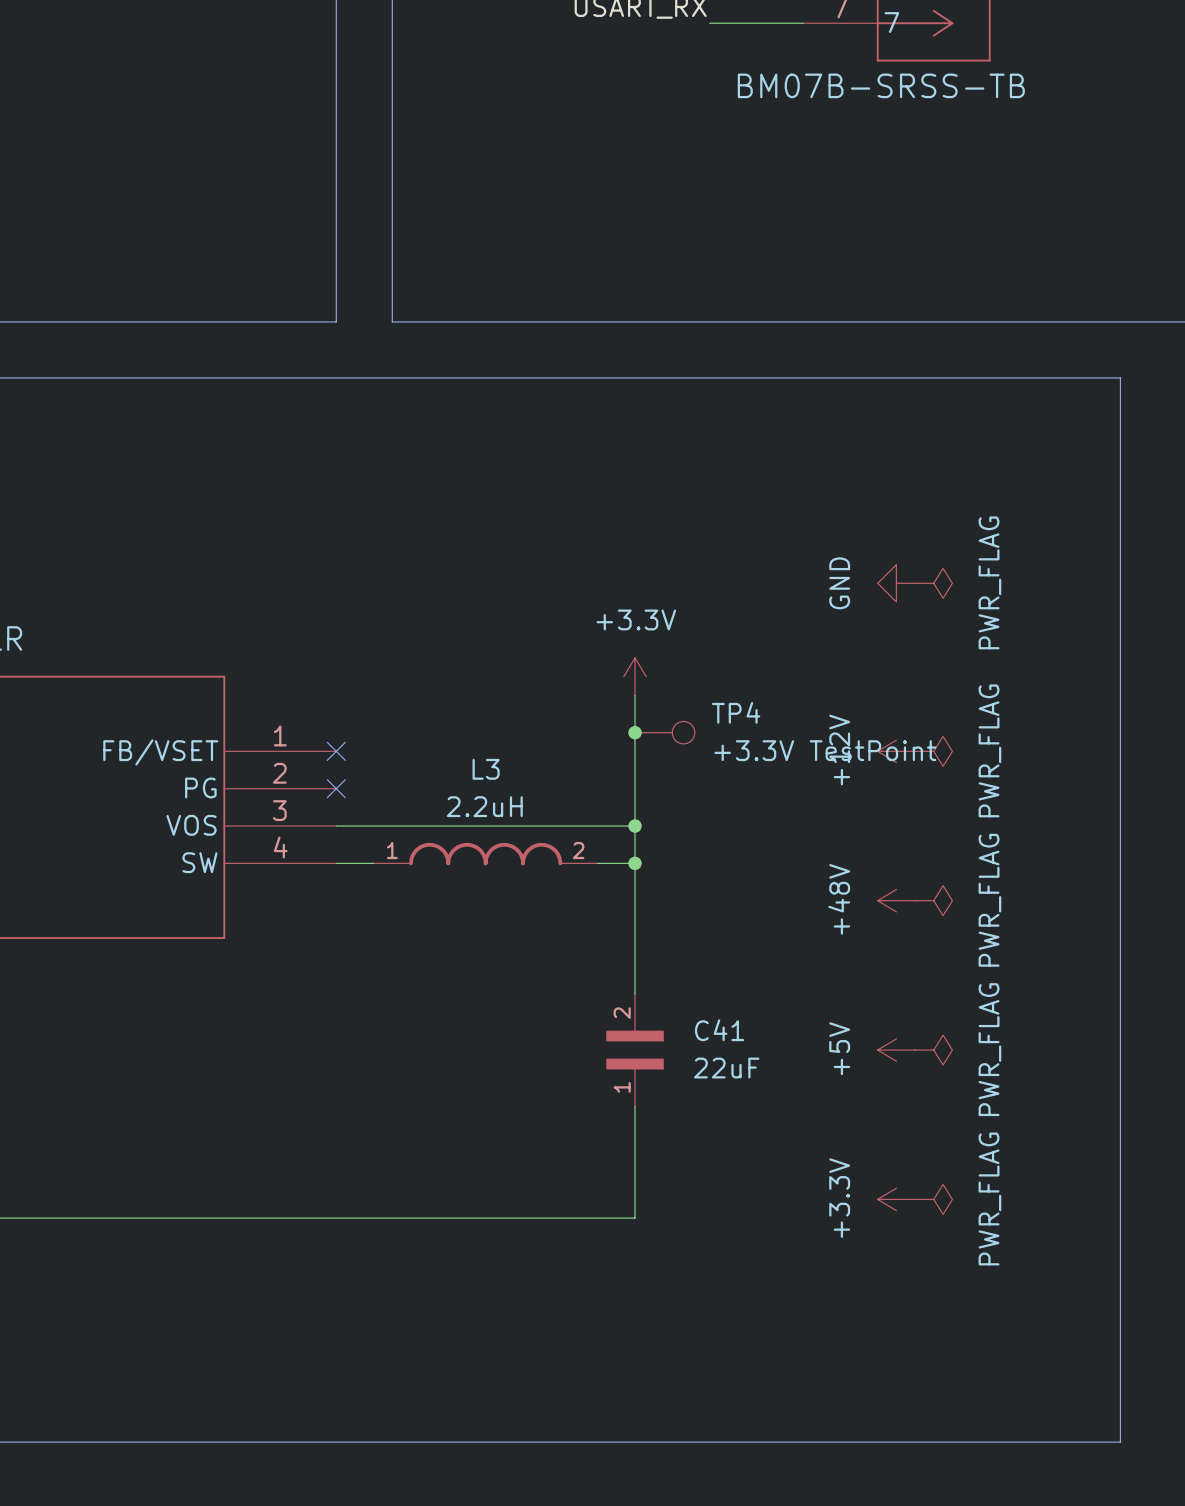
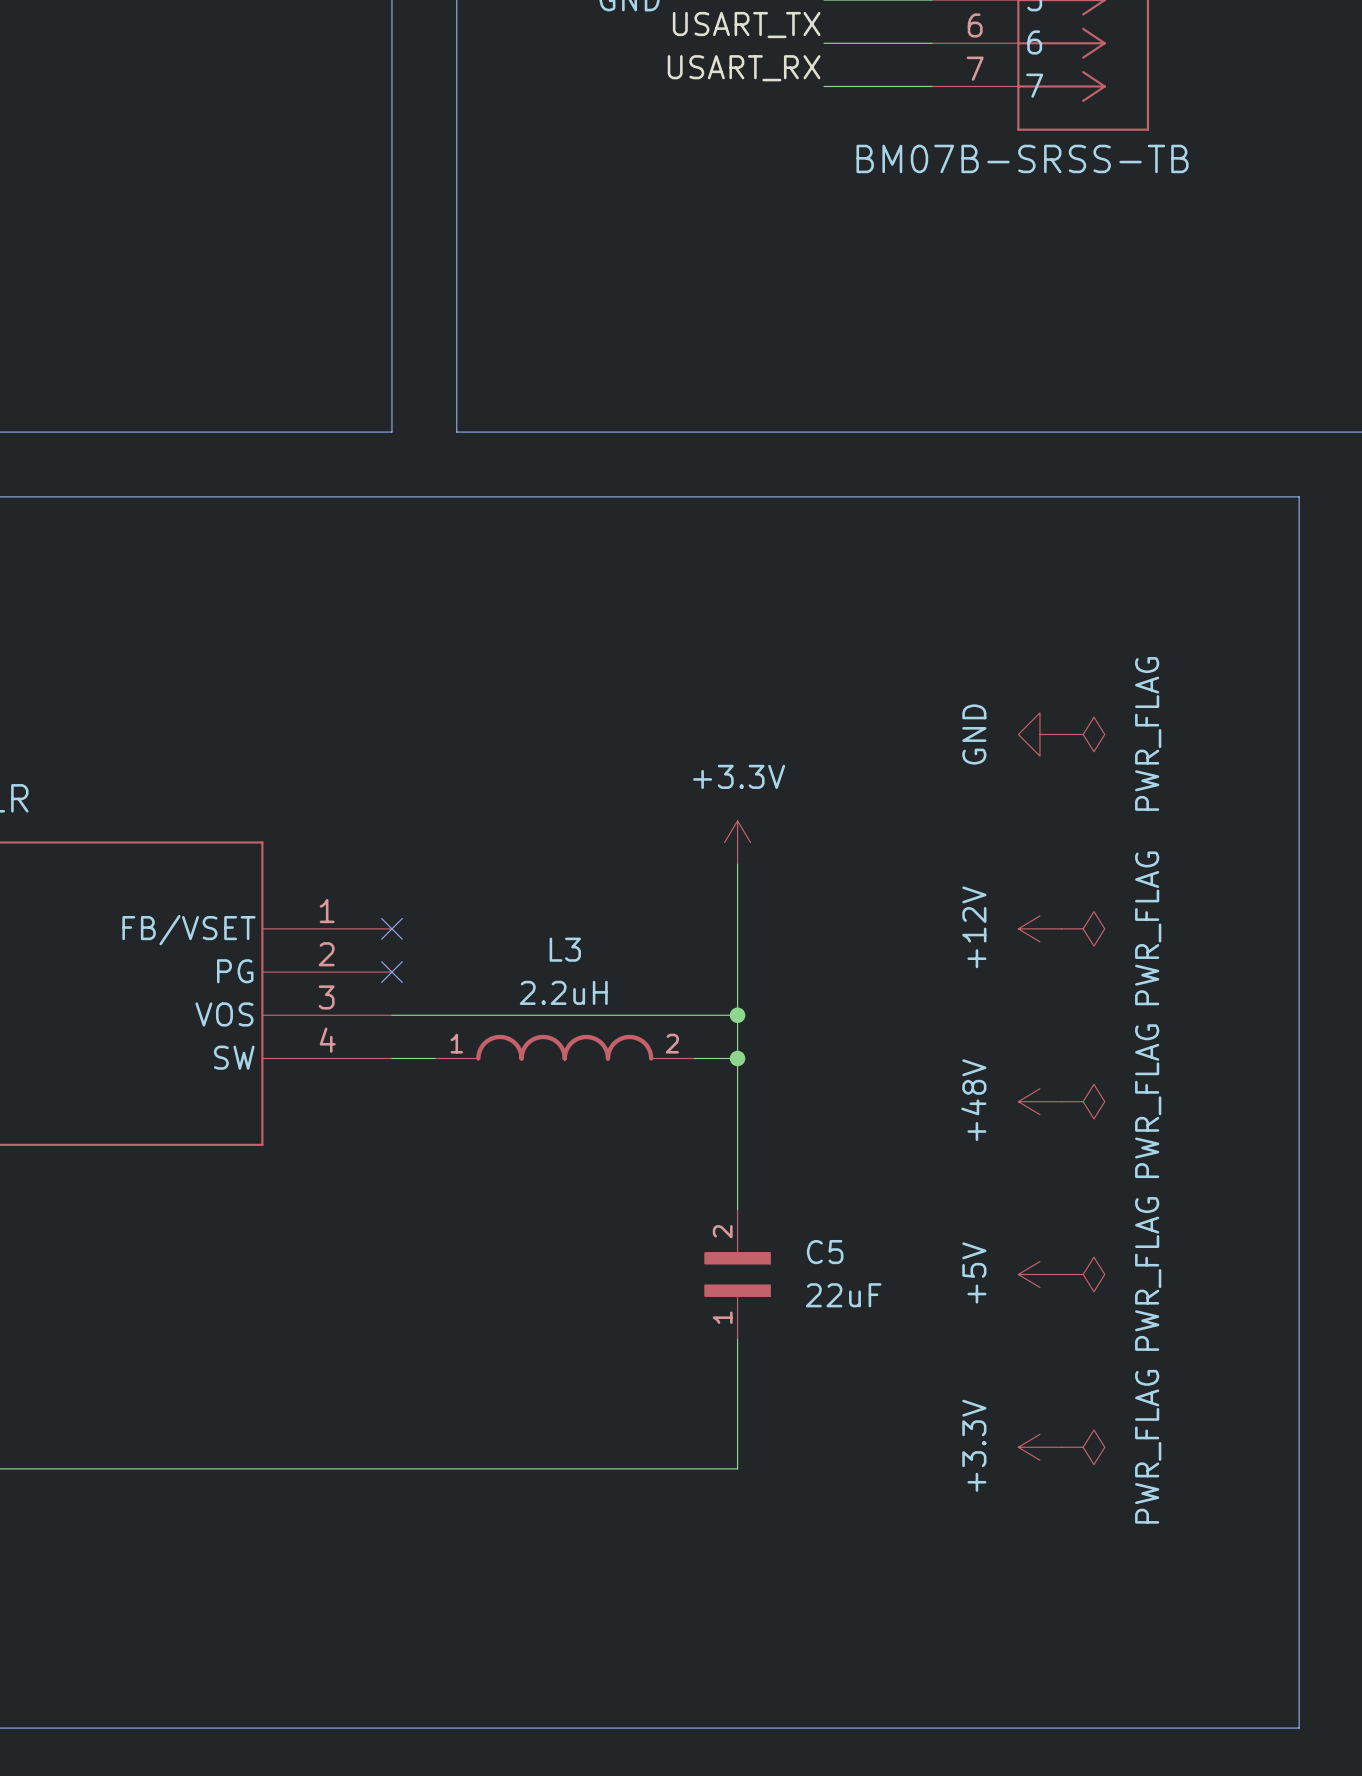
junction: (635, 732) -> none
TP4: +3.3V TestPoint (664, 732) -> none
C41 name: C41 (719, 1030) -> C5 (825, 1252)

